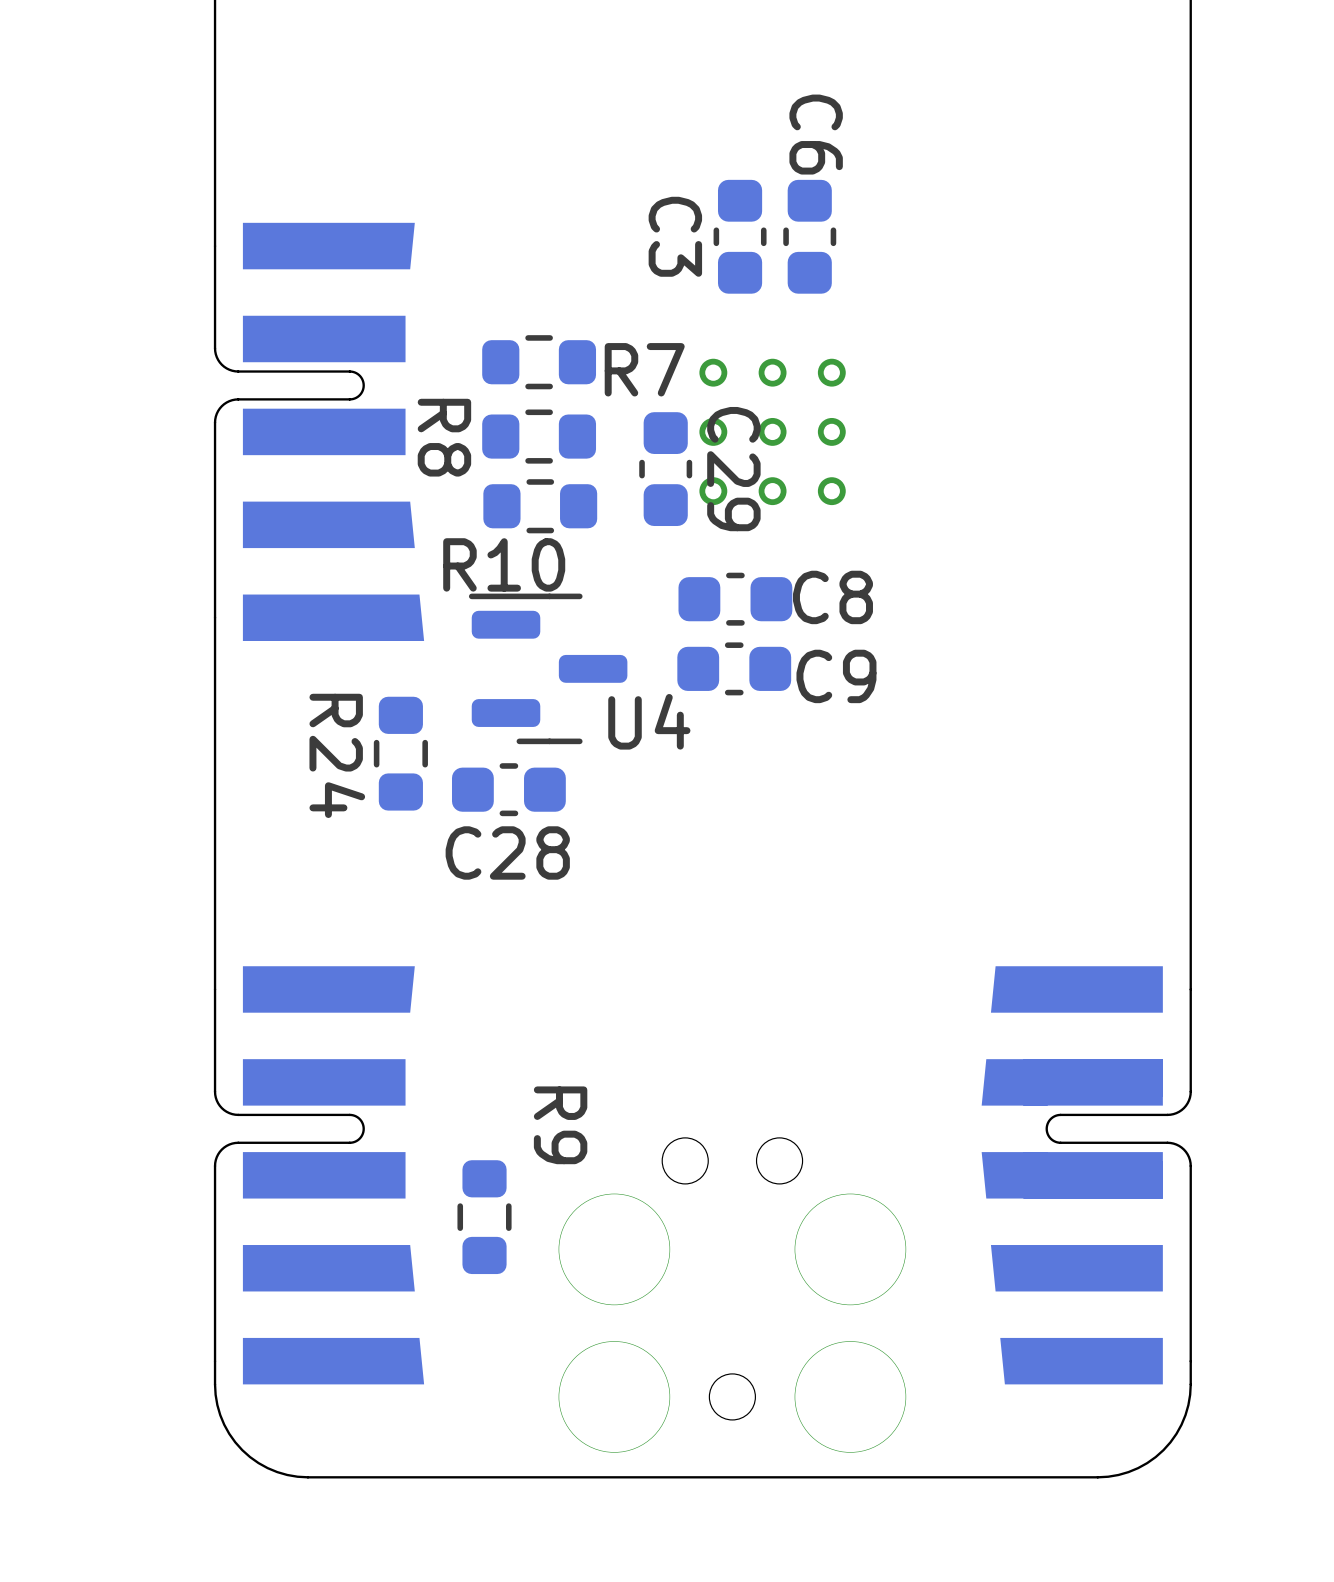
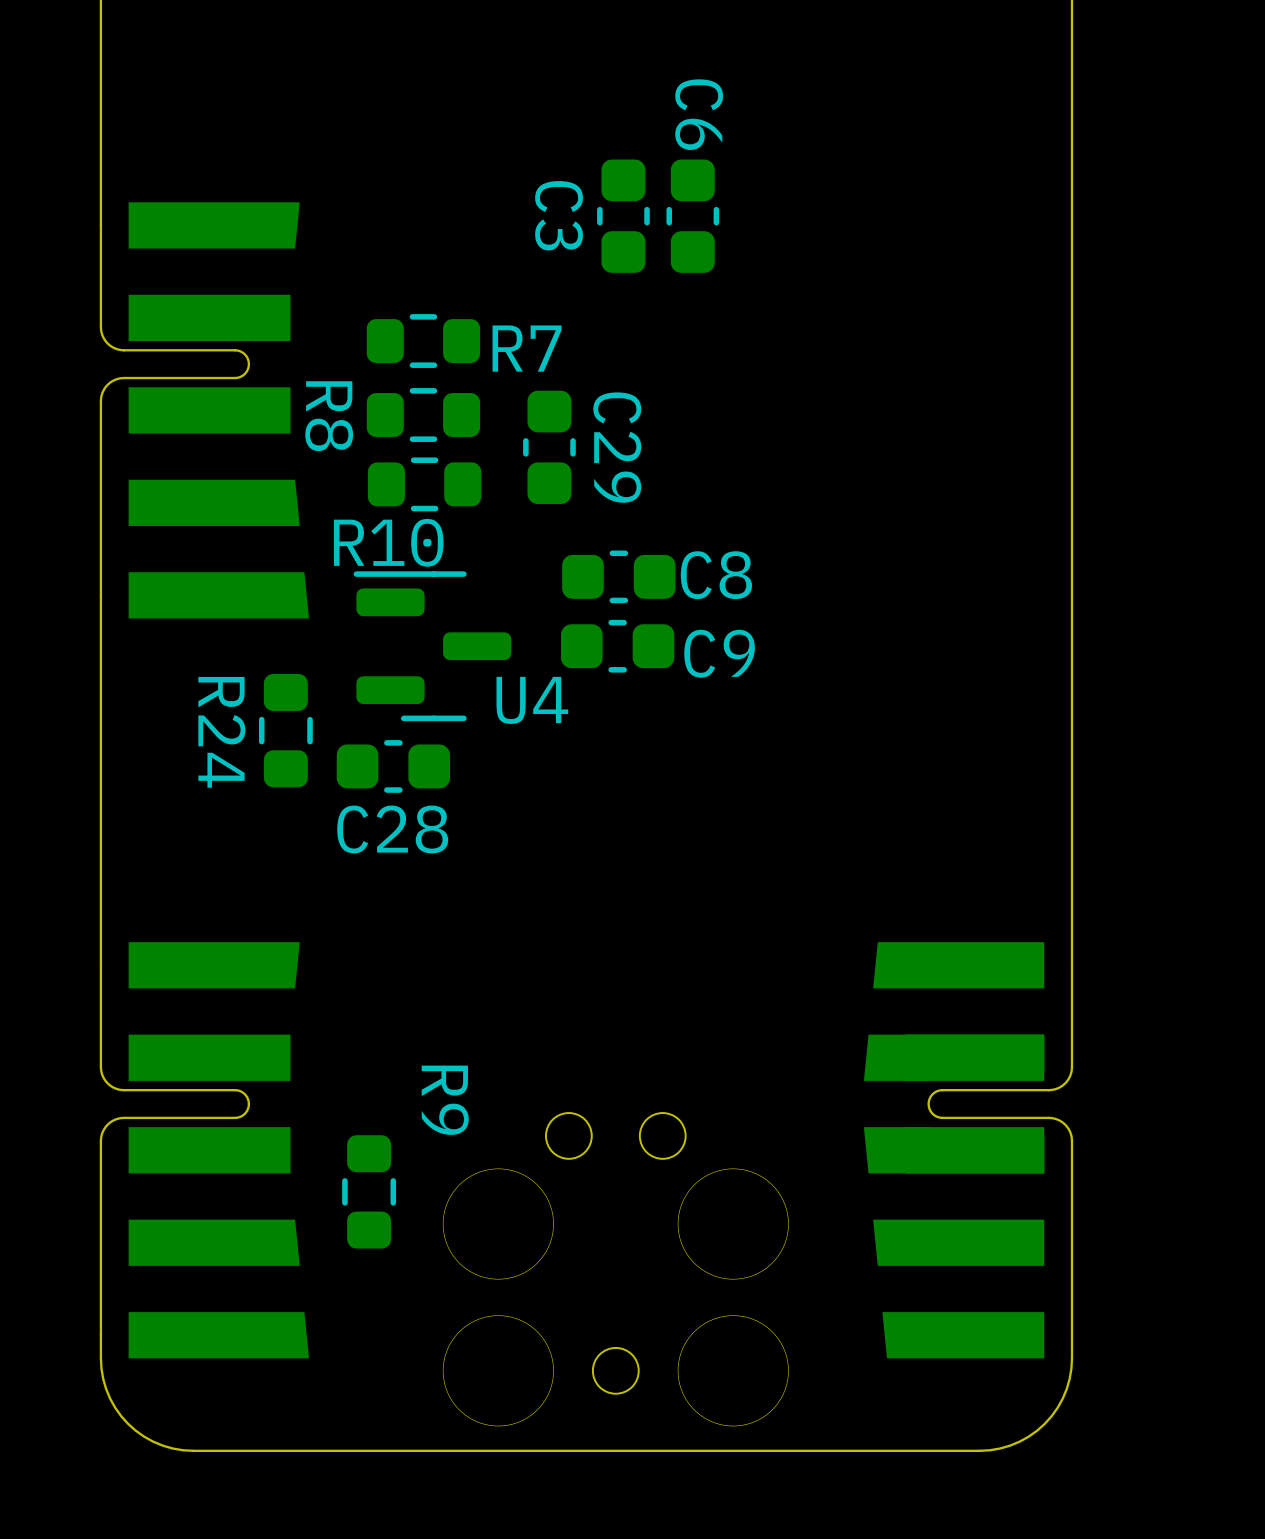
part: (772, 431) -> none

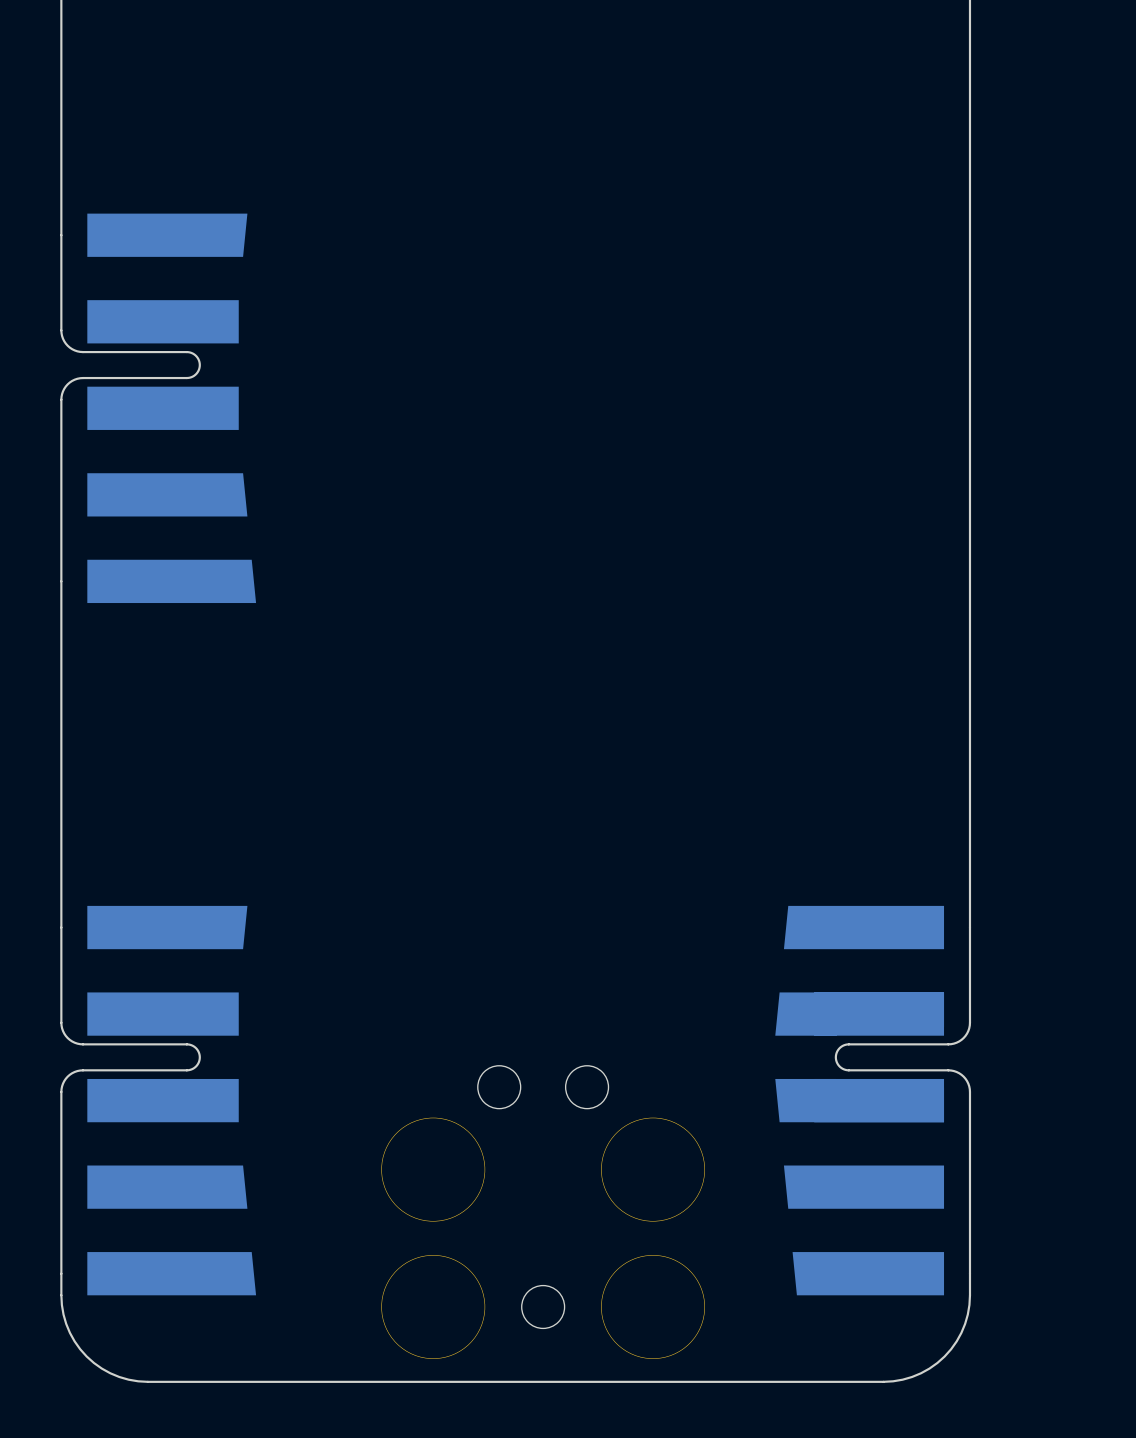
C3: (623, 216) -> none
C6: (692, 216) -> none
R7: (423, 341) -> none
R8: (423, 415) -> none
C29: (549, 447) -> none
R10: (424, 484) -> none
C8: (618, 576) -> none
U4: (432, 646) -> none
C9: (617, 646) -> none
R24: (285, 730) -> none
C28: (393, 766) -> none
R9: (369, 1191) -> none

